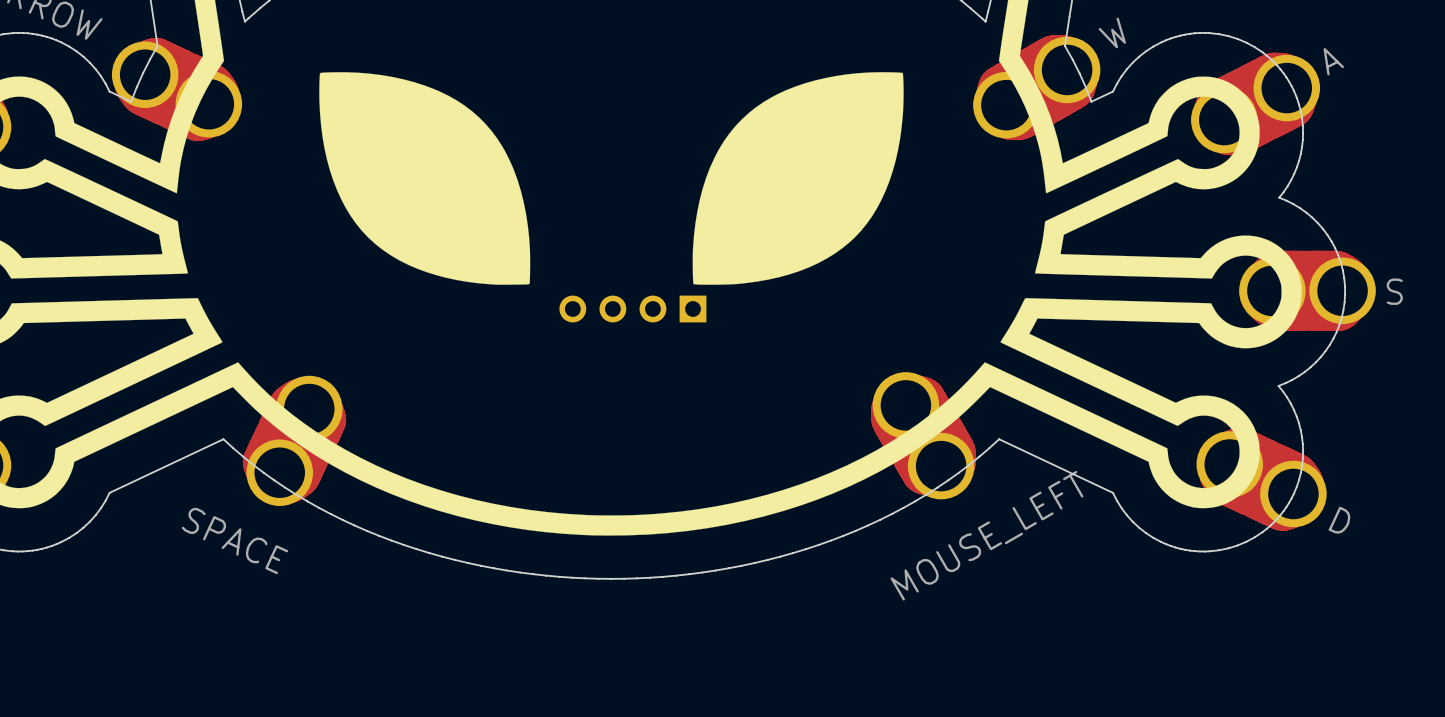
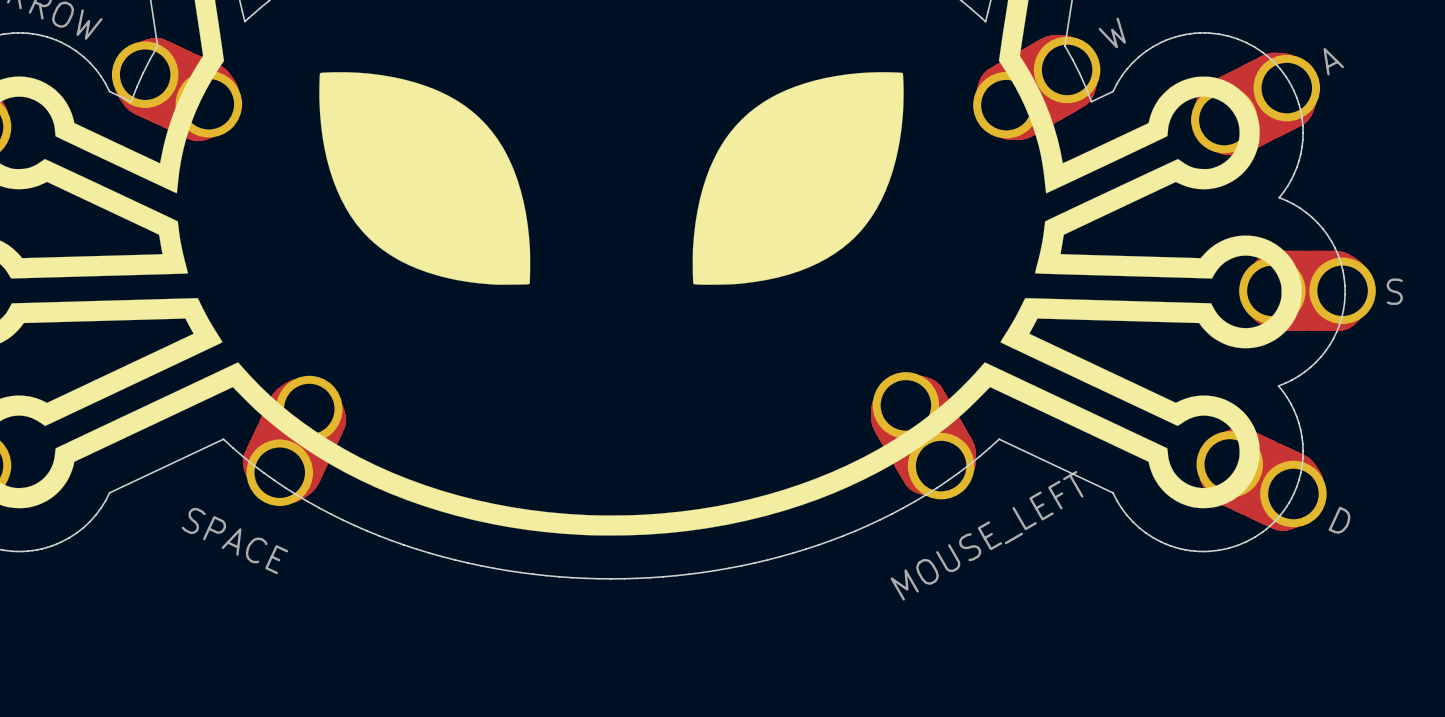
part: (632, 309) -> none

